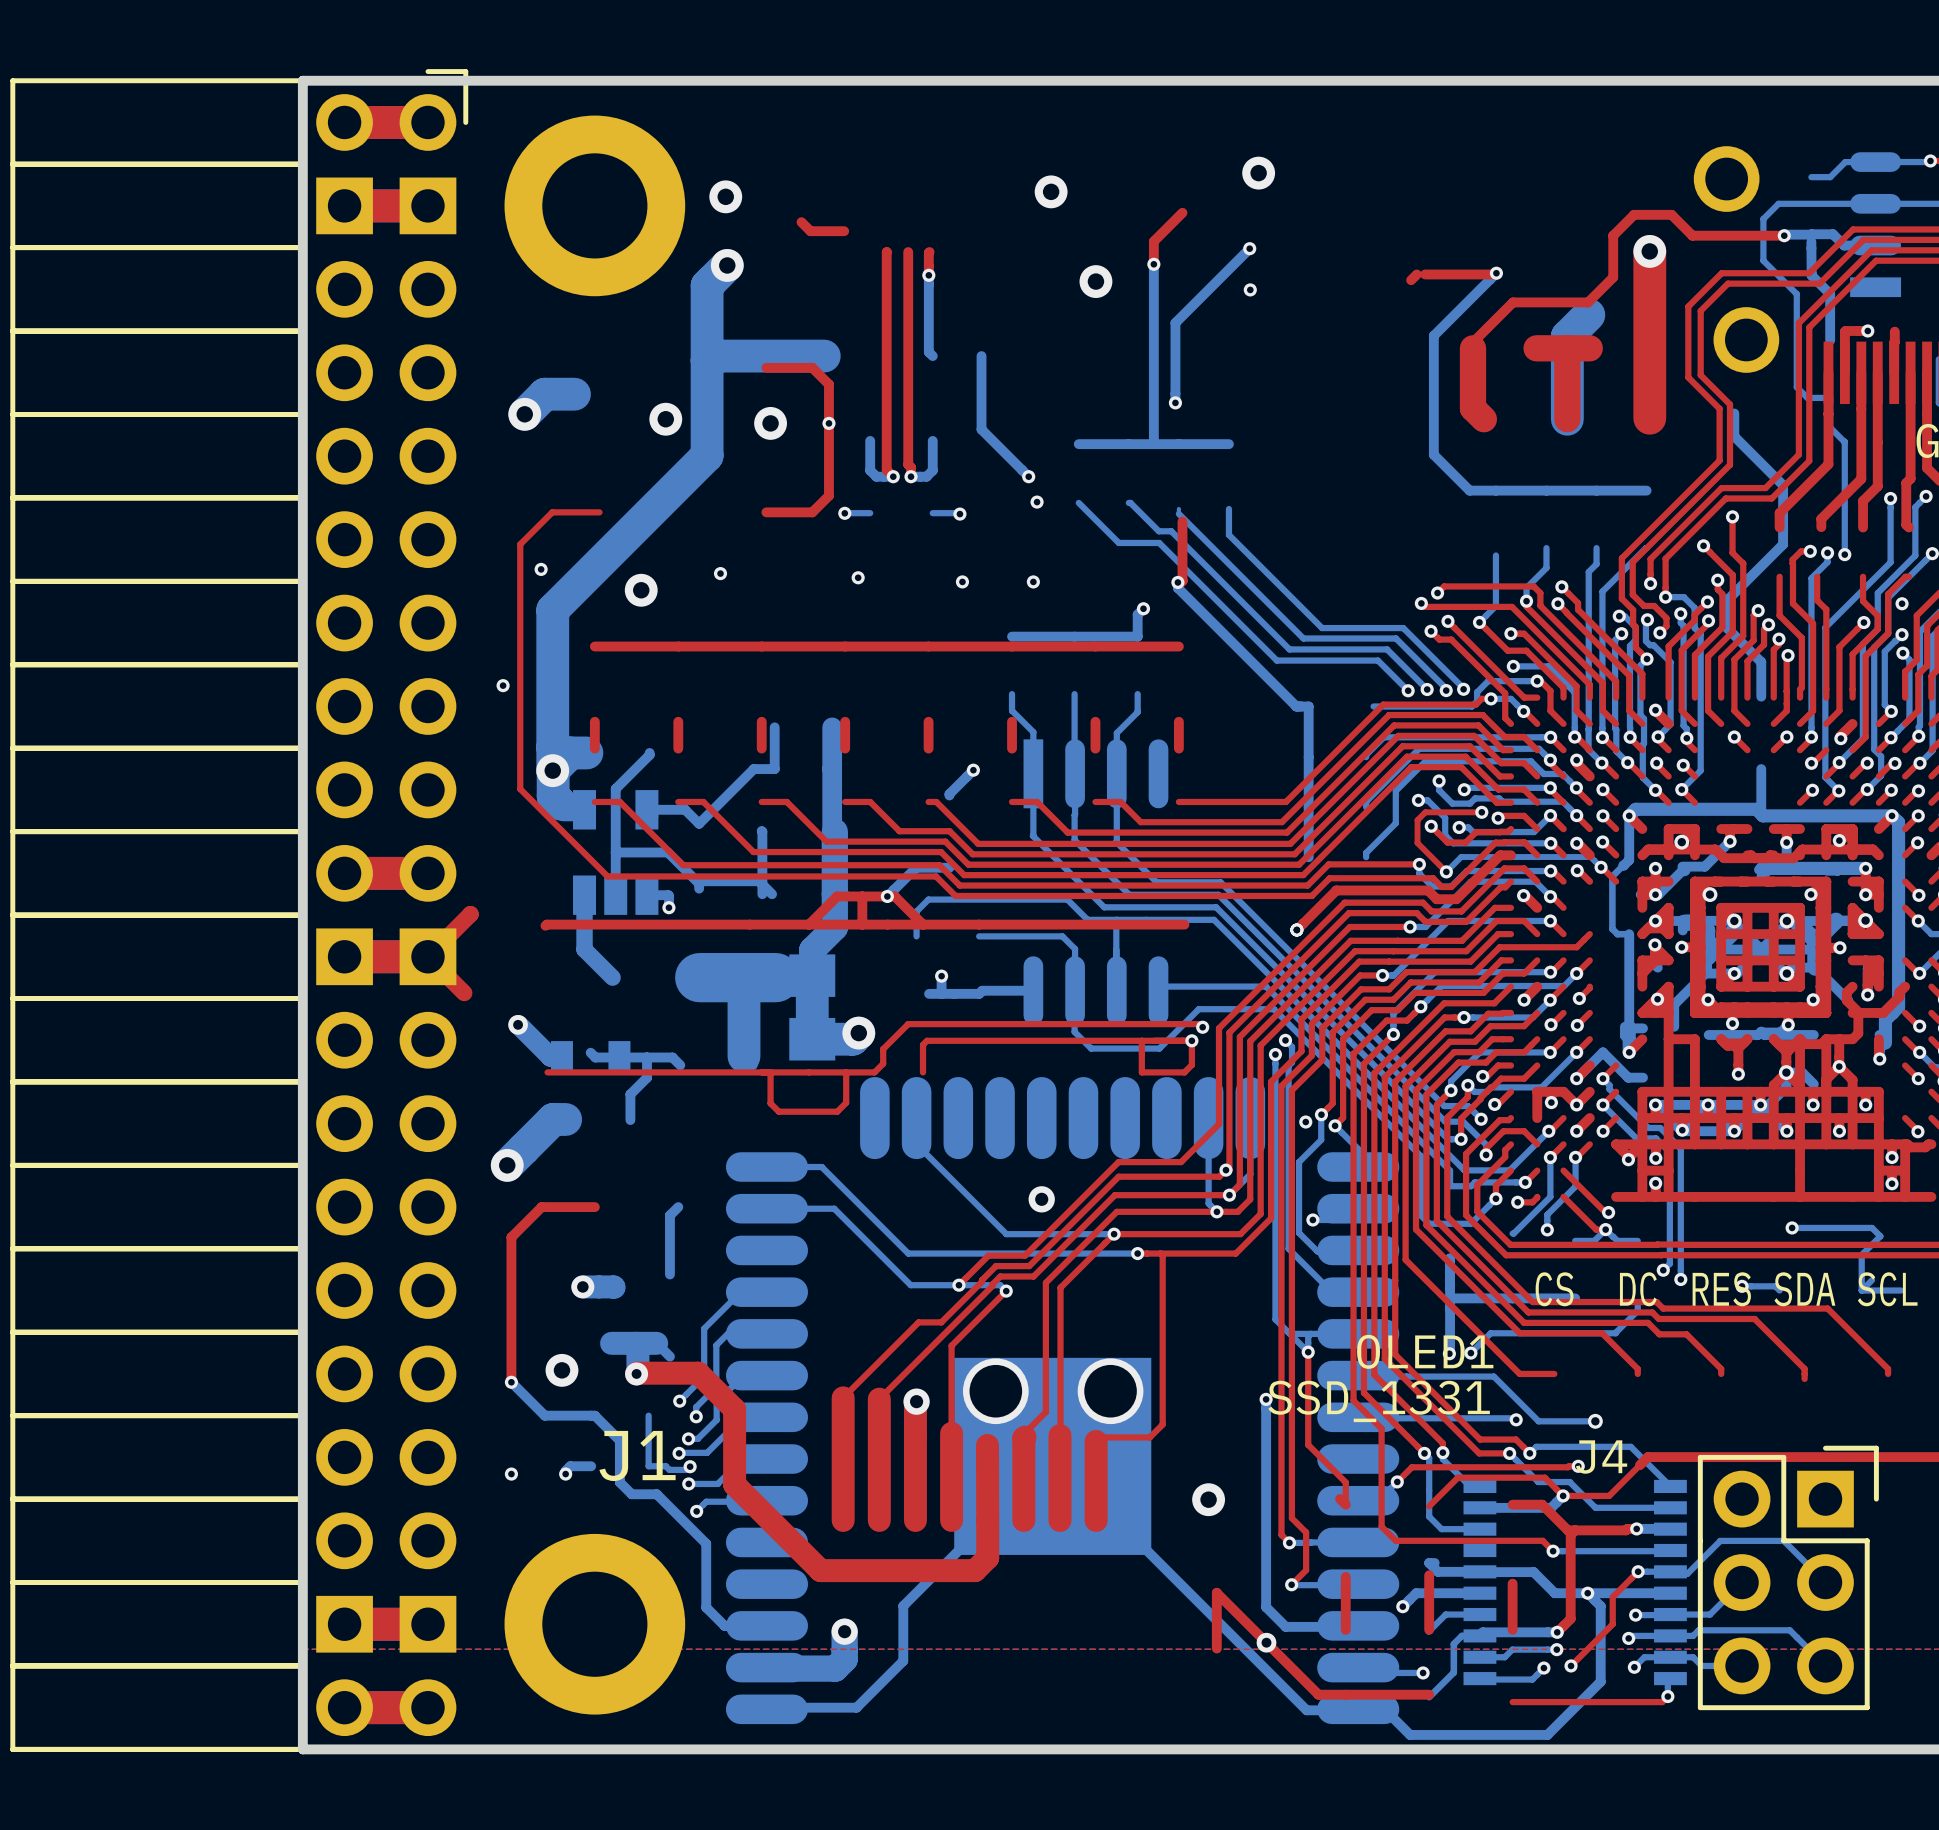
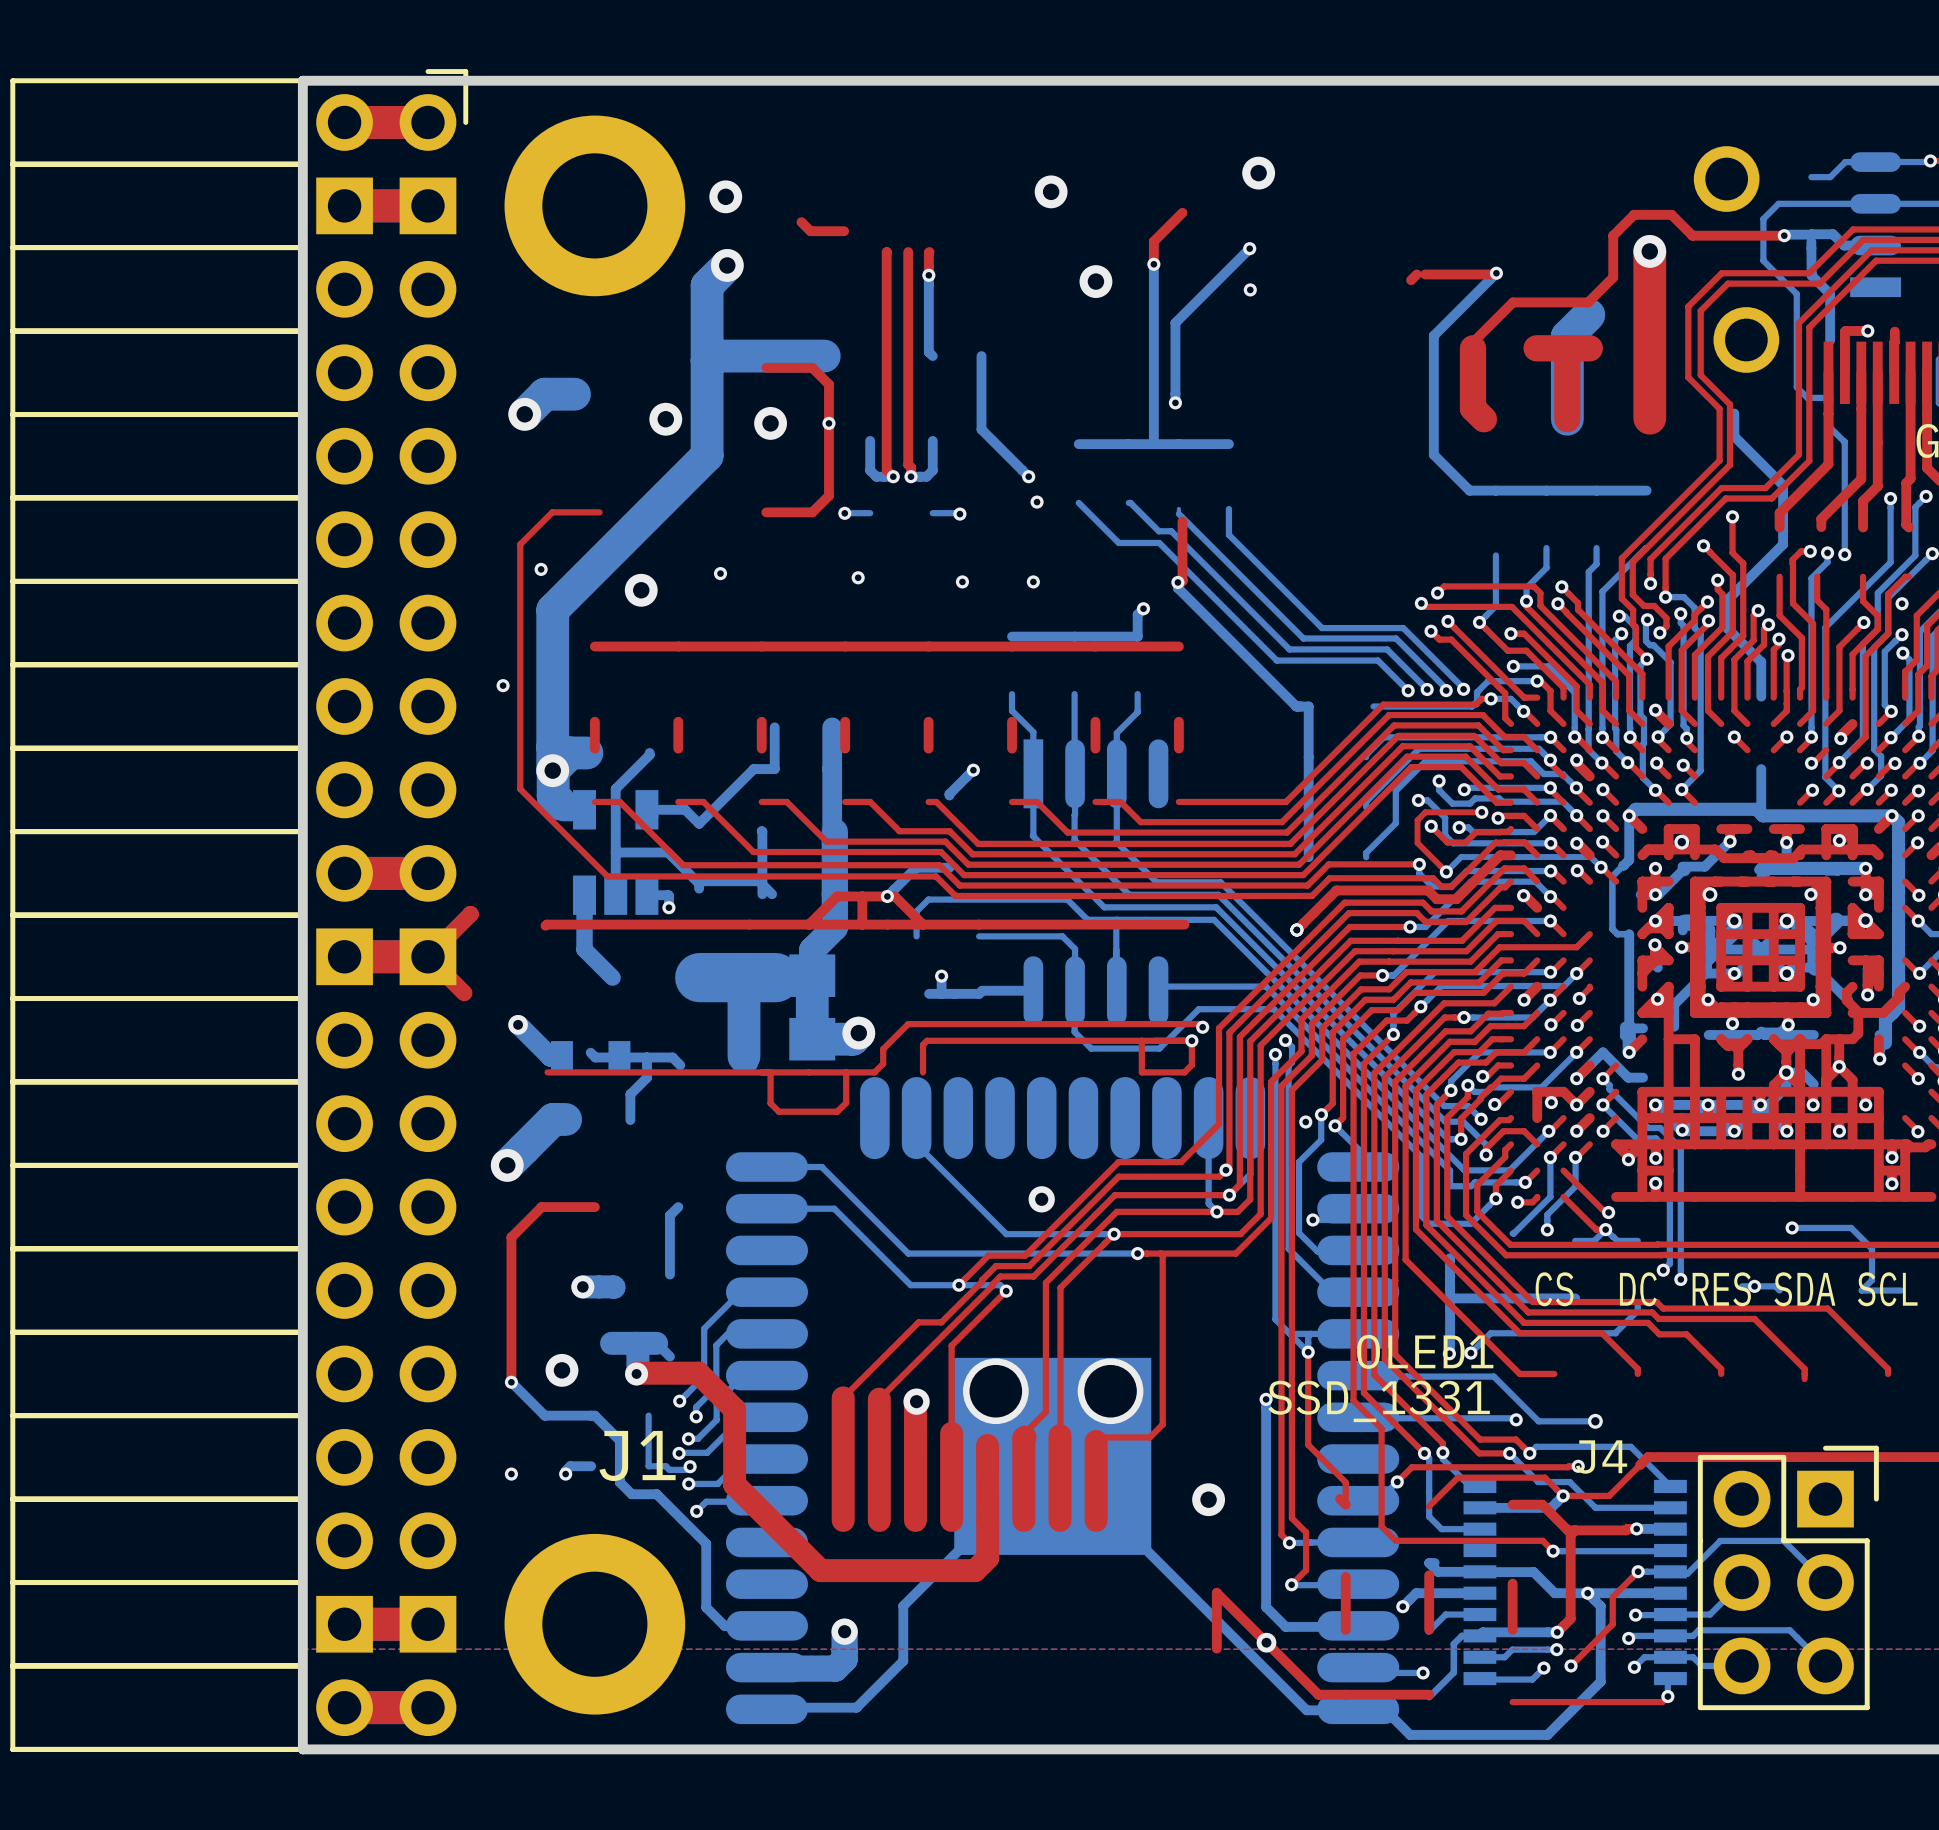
bottom track: (1851, 1227) (1872, 1227) (1880, 1236) (1861, 1254) (1861, 1290) -> (1851, 1227) (1872, 1248) (1872, 1280)
via position: (1742, 1286) -> (1754, 1286)

